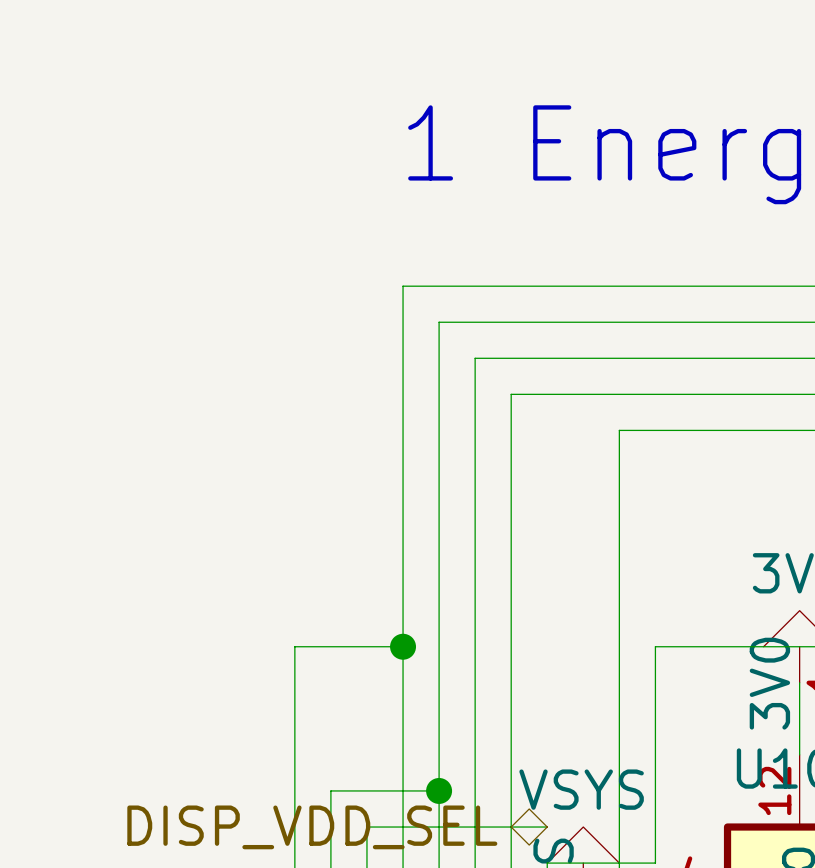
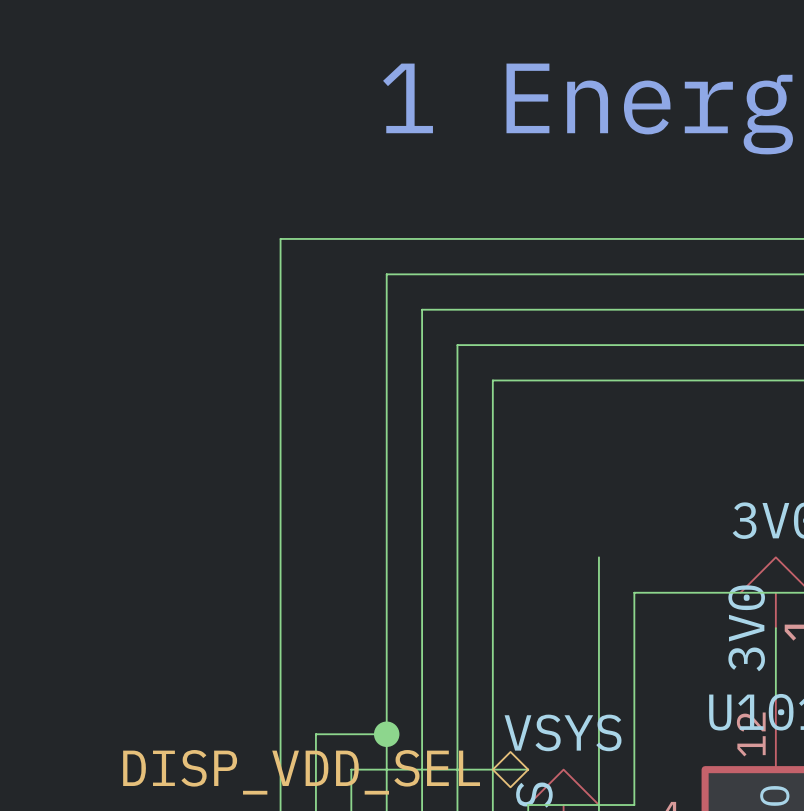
wire: (403, 286) (403, 322) -> (386, 238) (280, 238) (280, 592)
wire: (439, 322) (439, 358) -> (422, 274) (386, 274)
wire: (475, 358) (475, 394) -> (457, 309) (422, 309)
wire: (511, 394) (511, 430) -> (492, 345) (457, 345)
wire: (619, 430) (619, 610) -> (598, 380) (492, 380)
wire: (294, 646) (403, 646) -> none
junction: (403, 646) -> none
wire: (403, 790) (439, 790) -> none
junction position: (439, 790) -> (386, 734)

